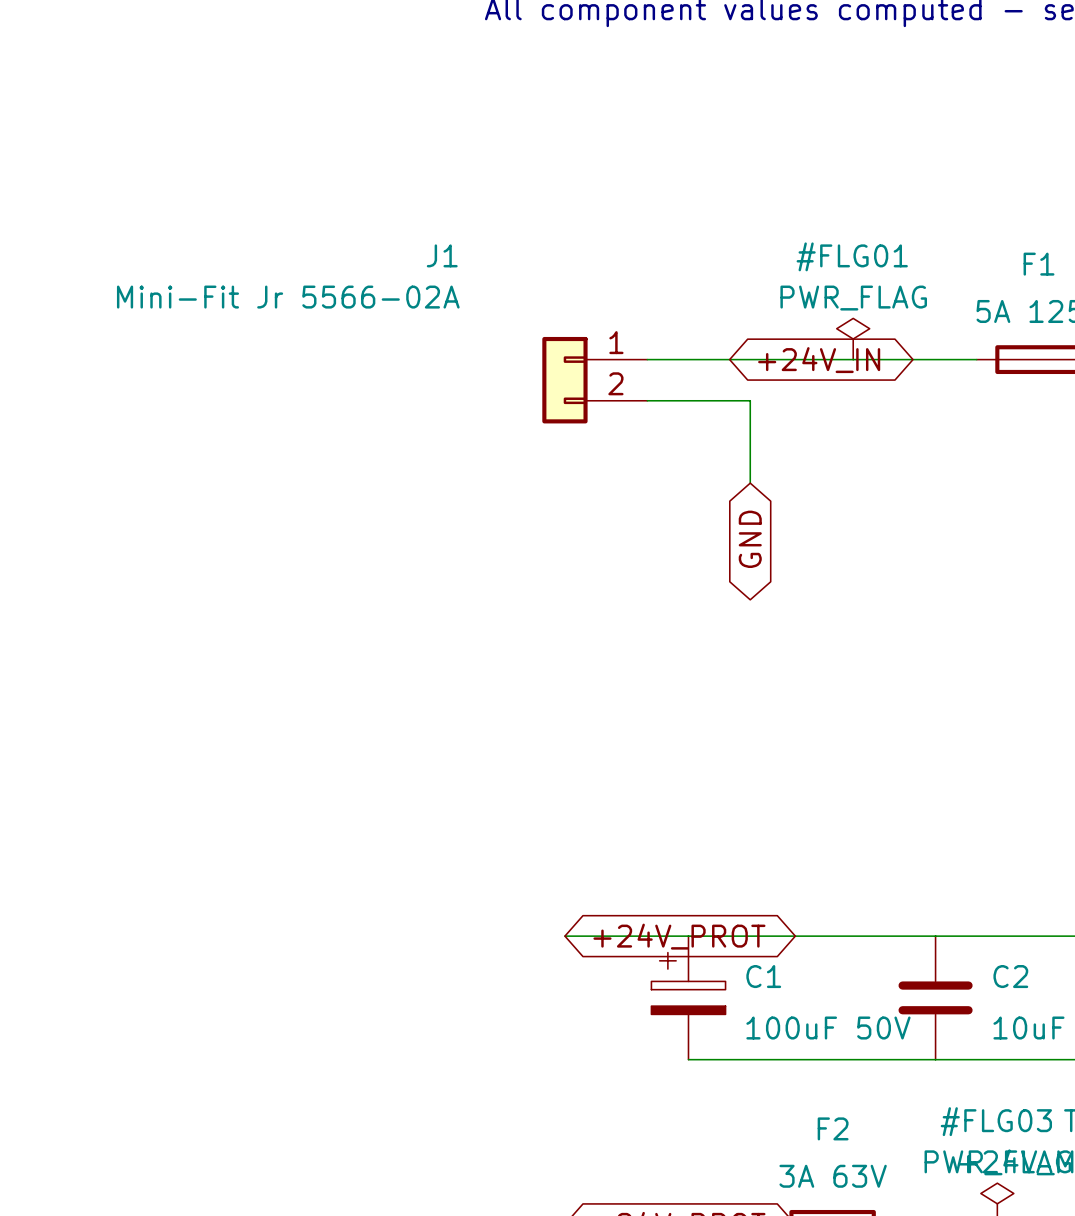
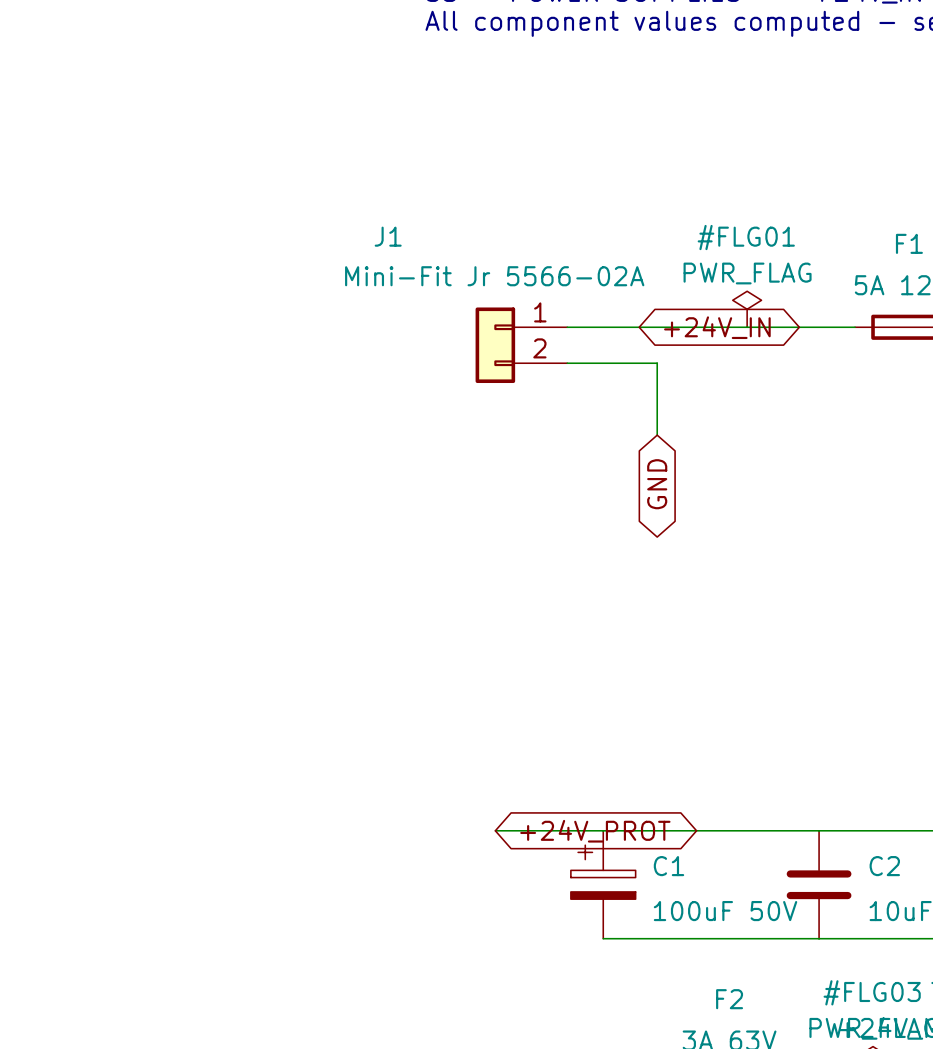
J1 value position: Mini-Fit Jr 5566-02A (288, 297) -> Mini-Fit Jr 5566-02A (494, 276)

